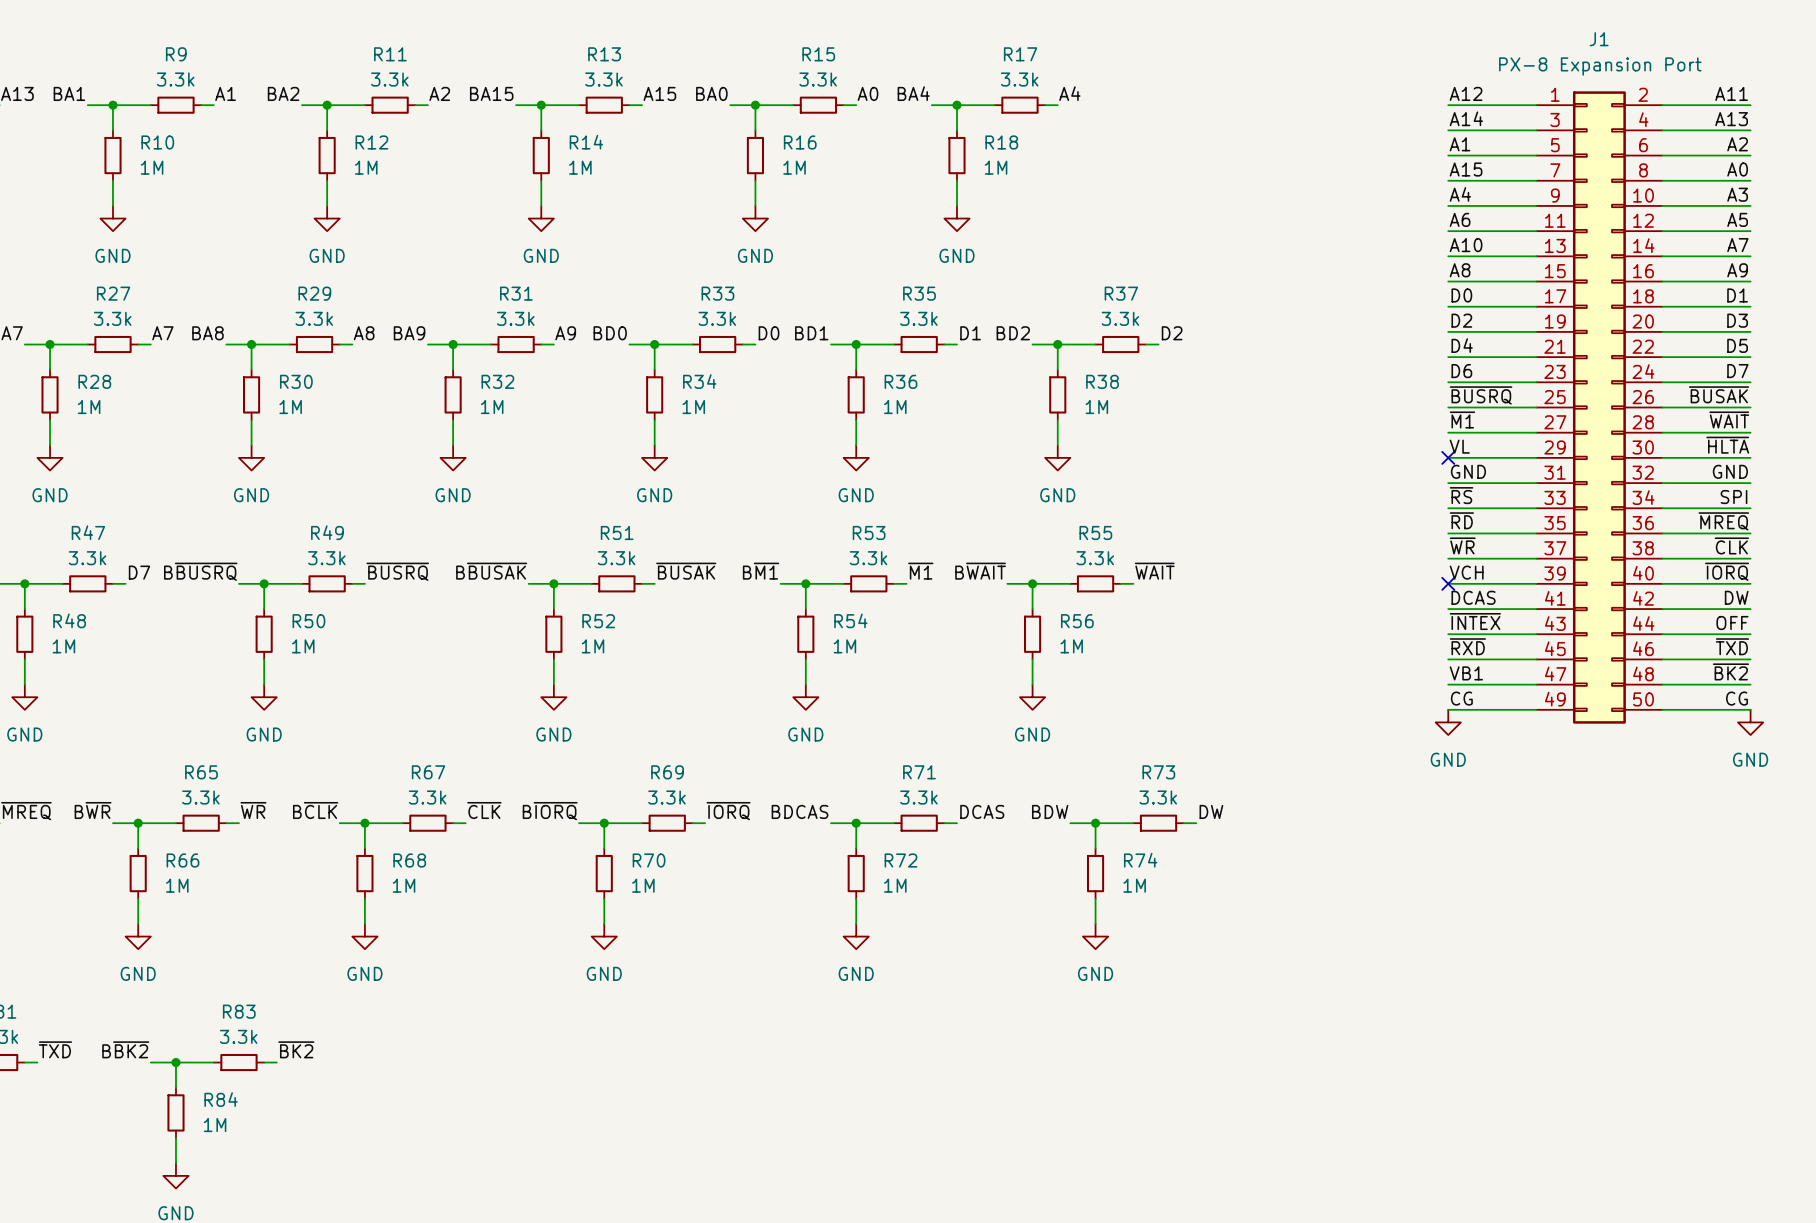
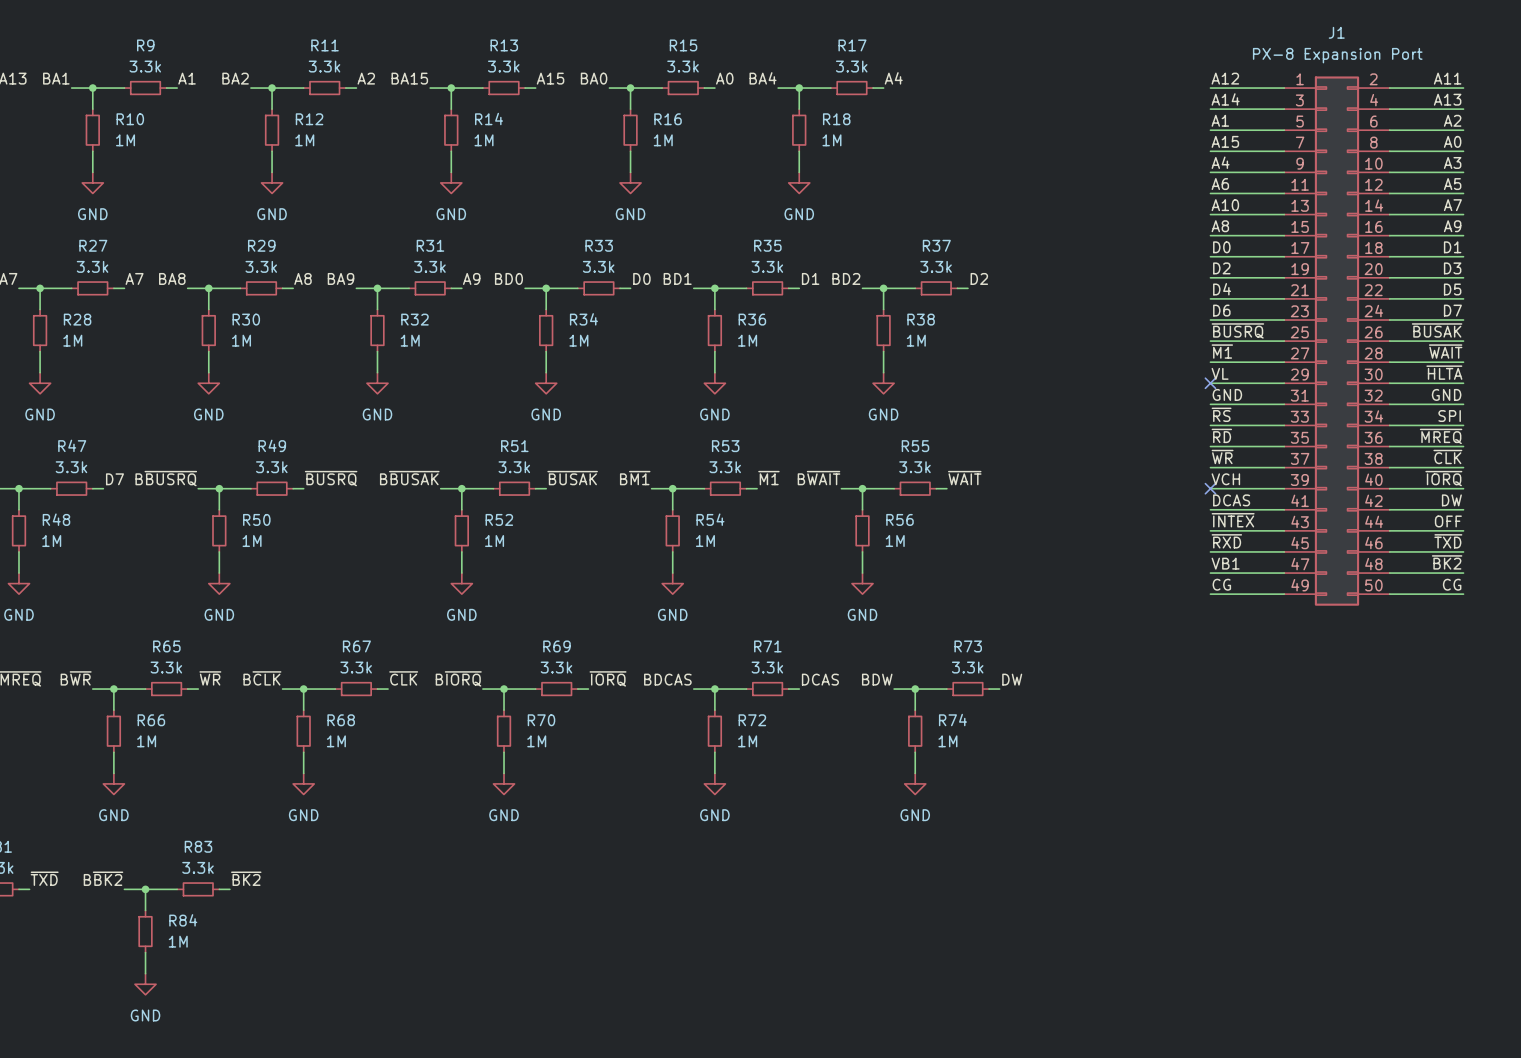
power symbol: GND (1448, 722) -> none
power symbol: GND (1750, 722) -> none

